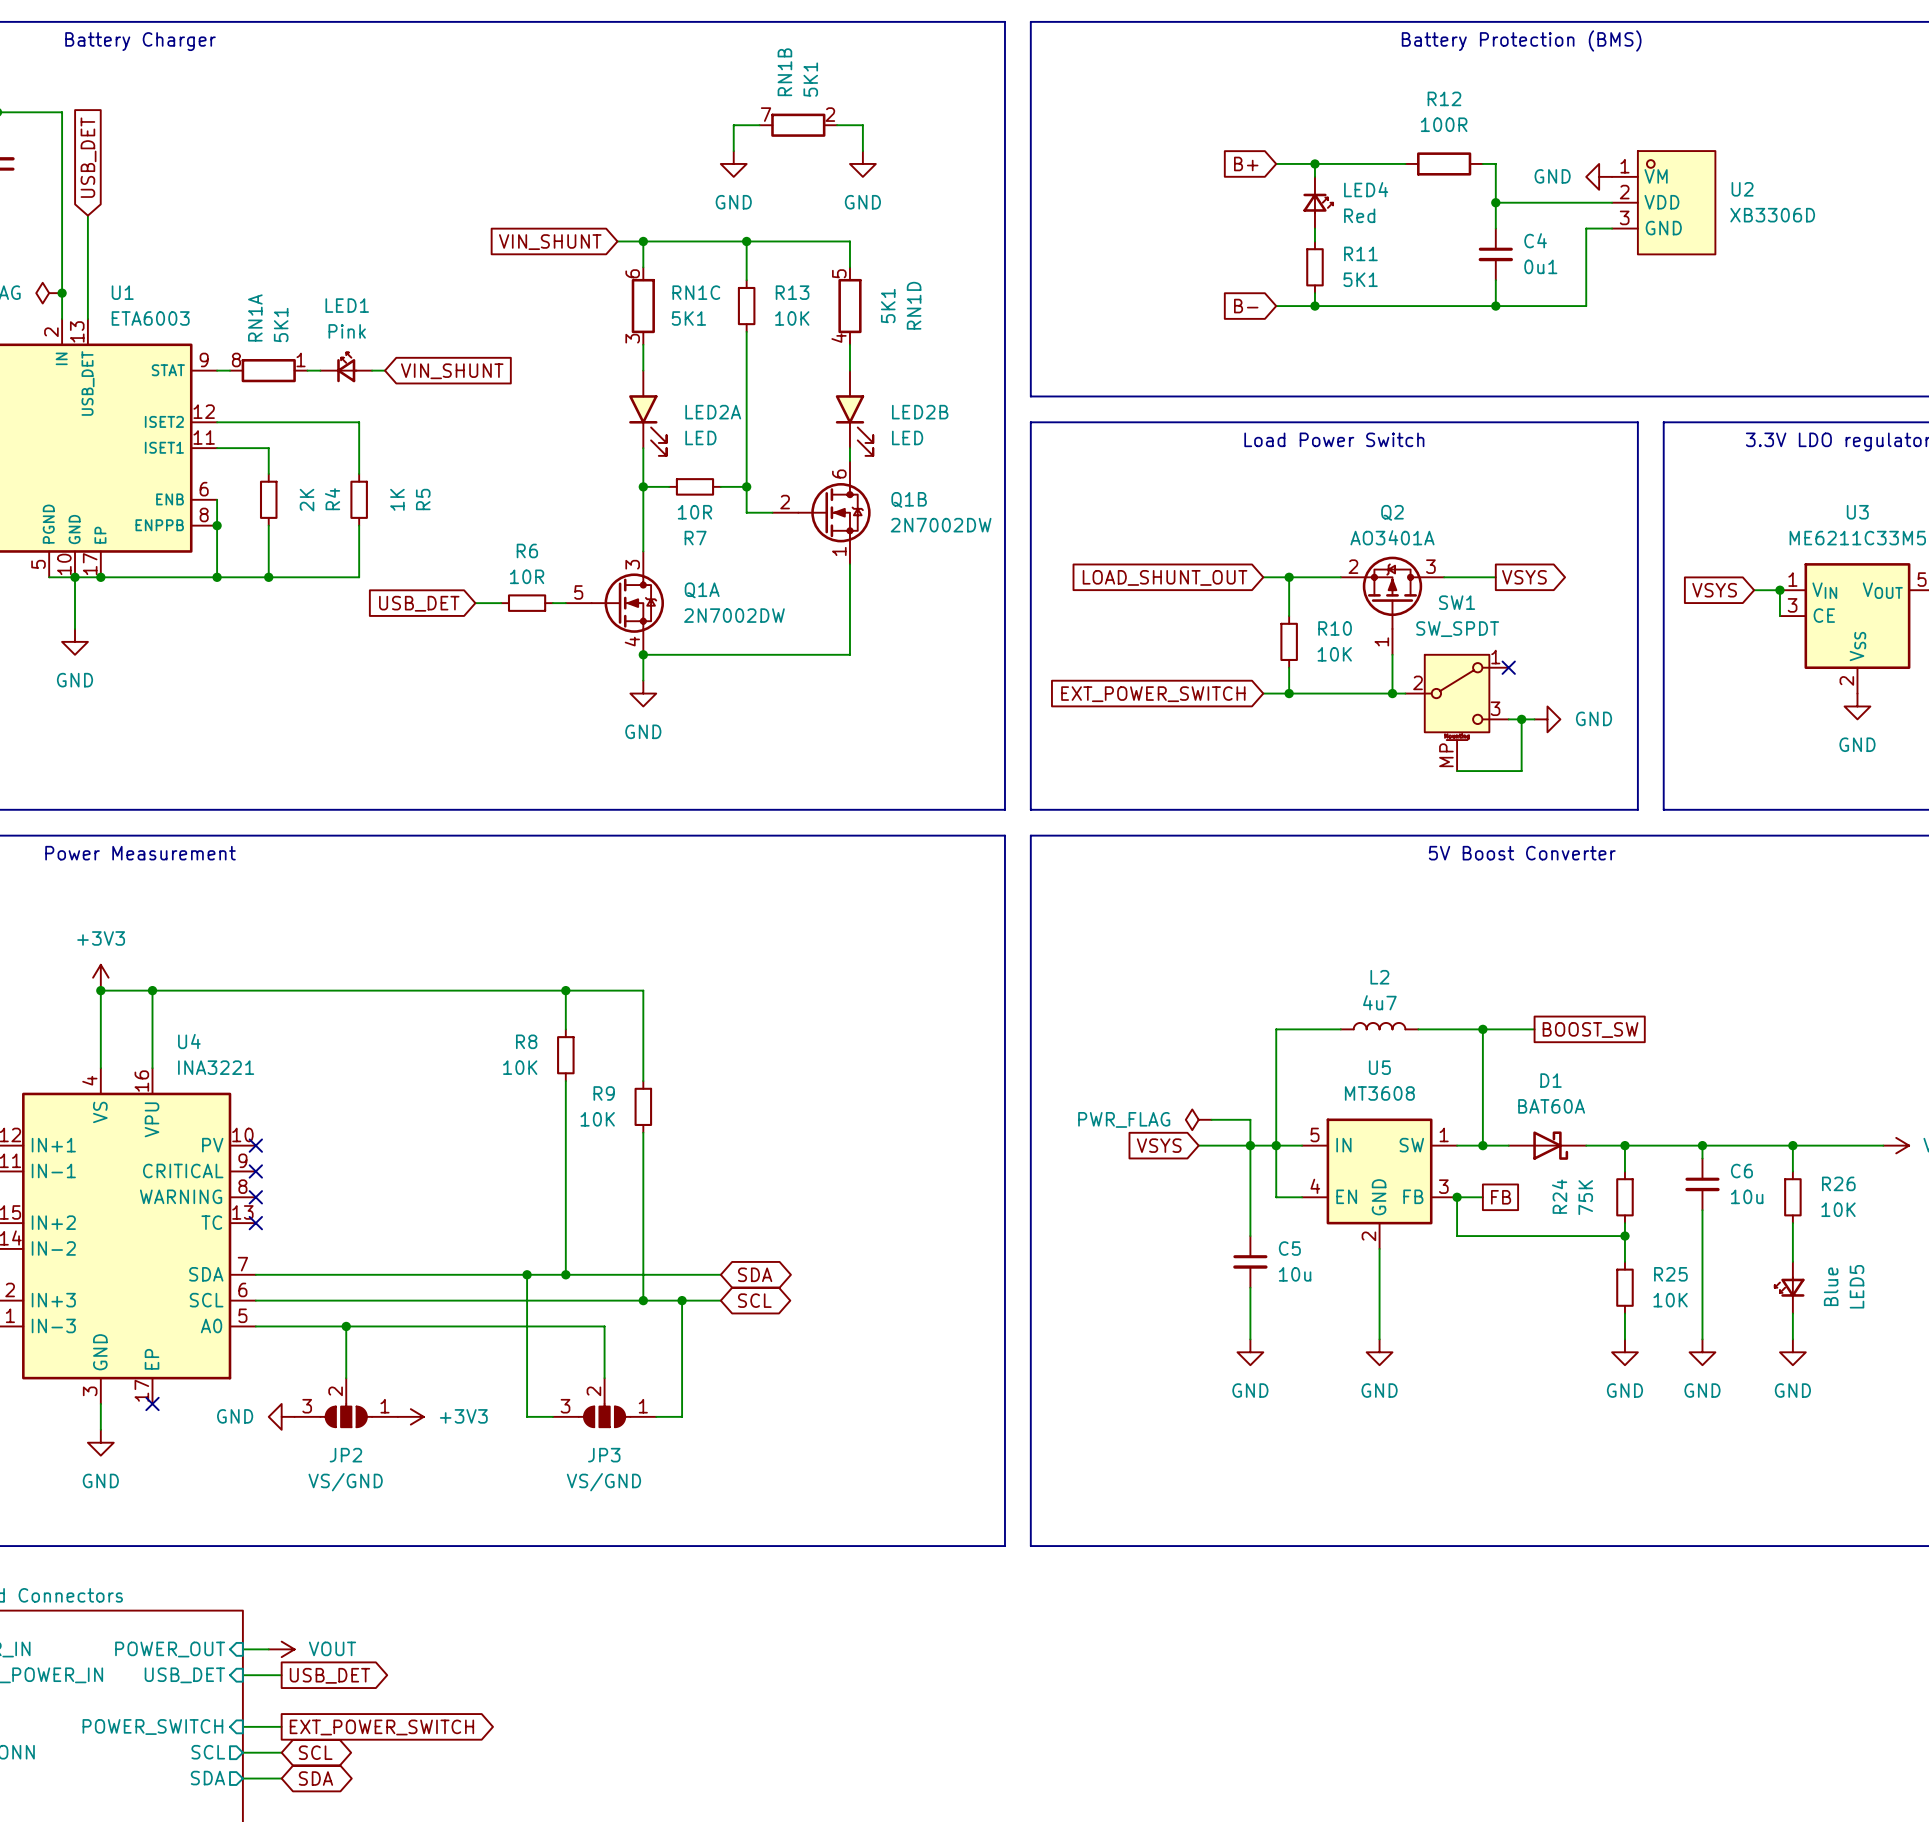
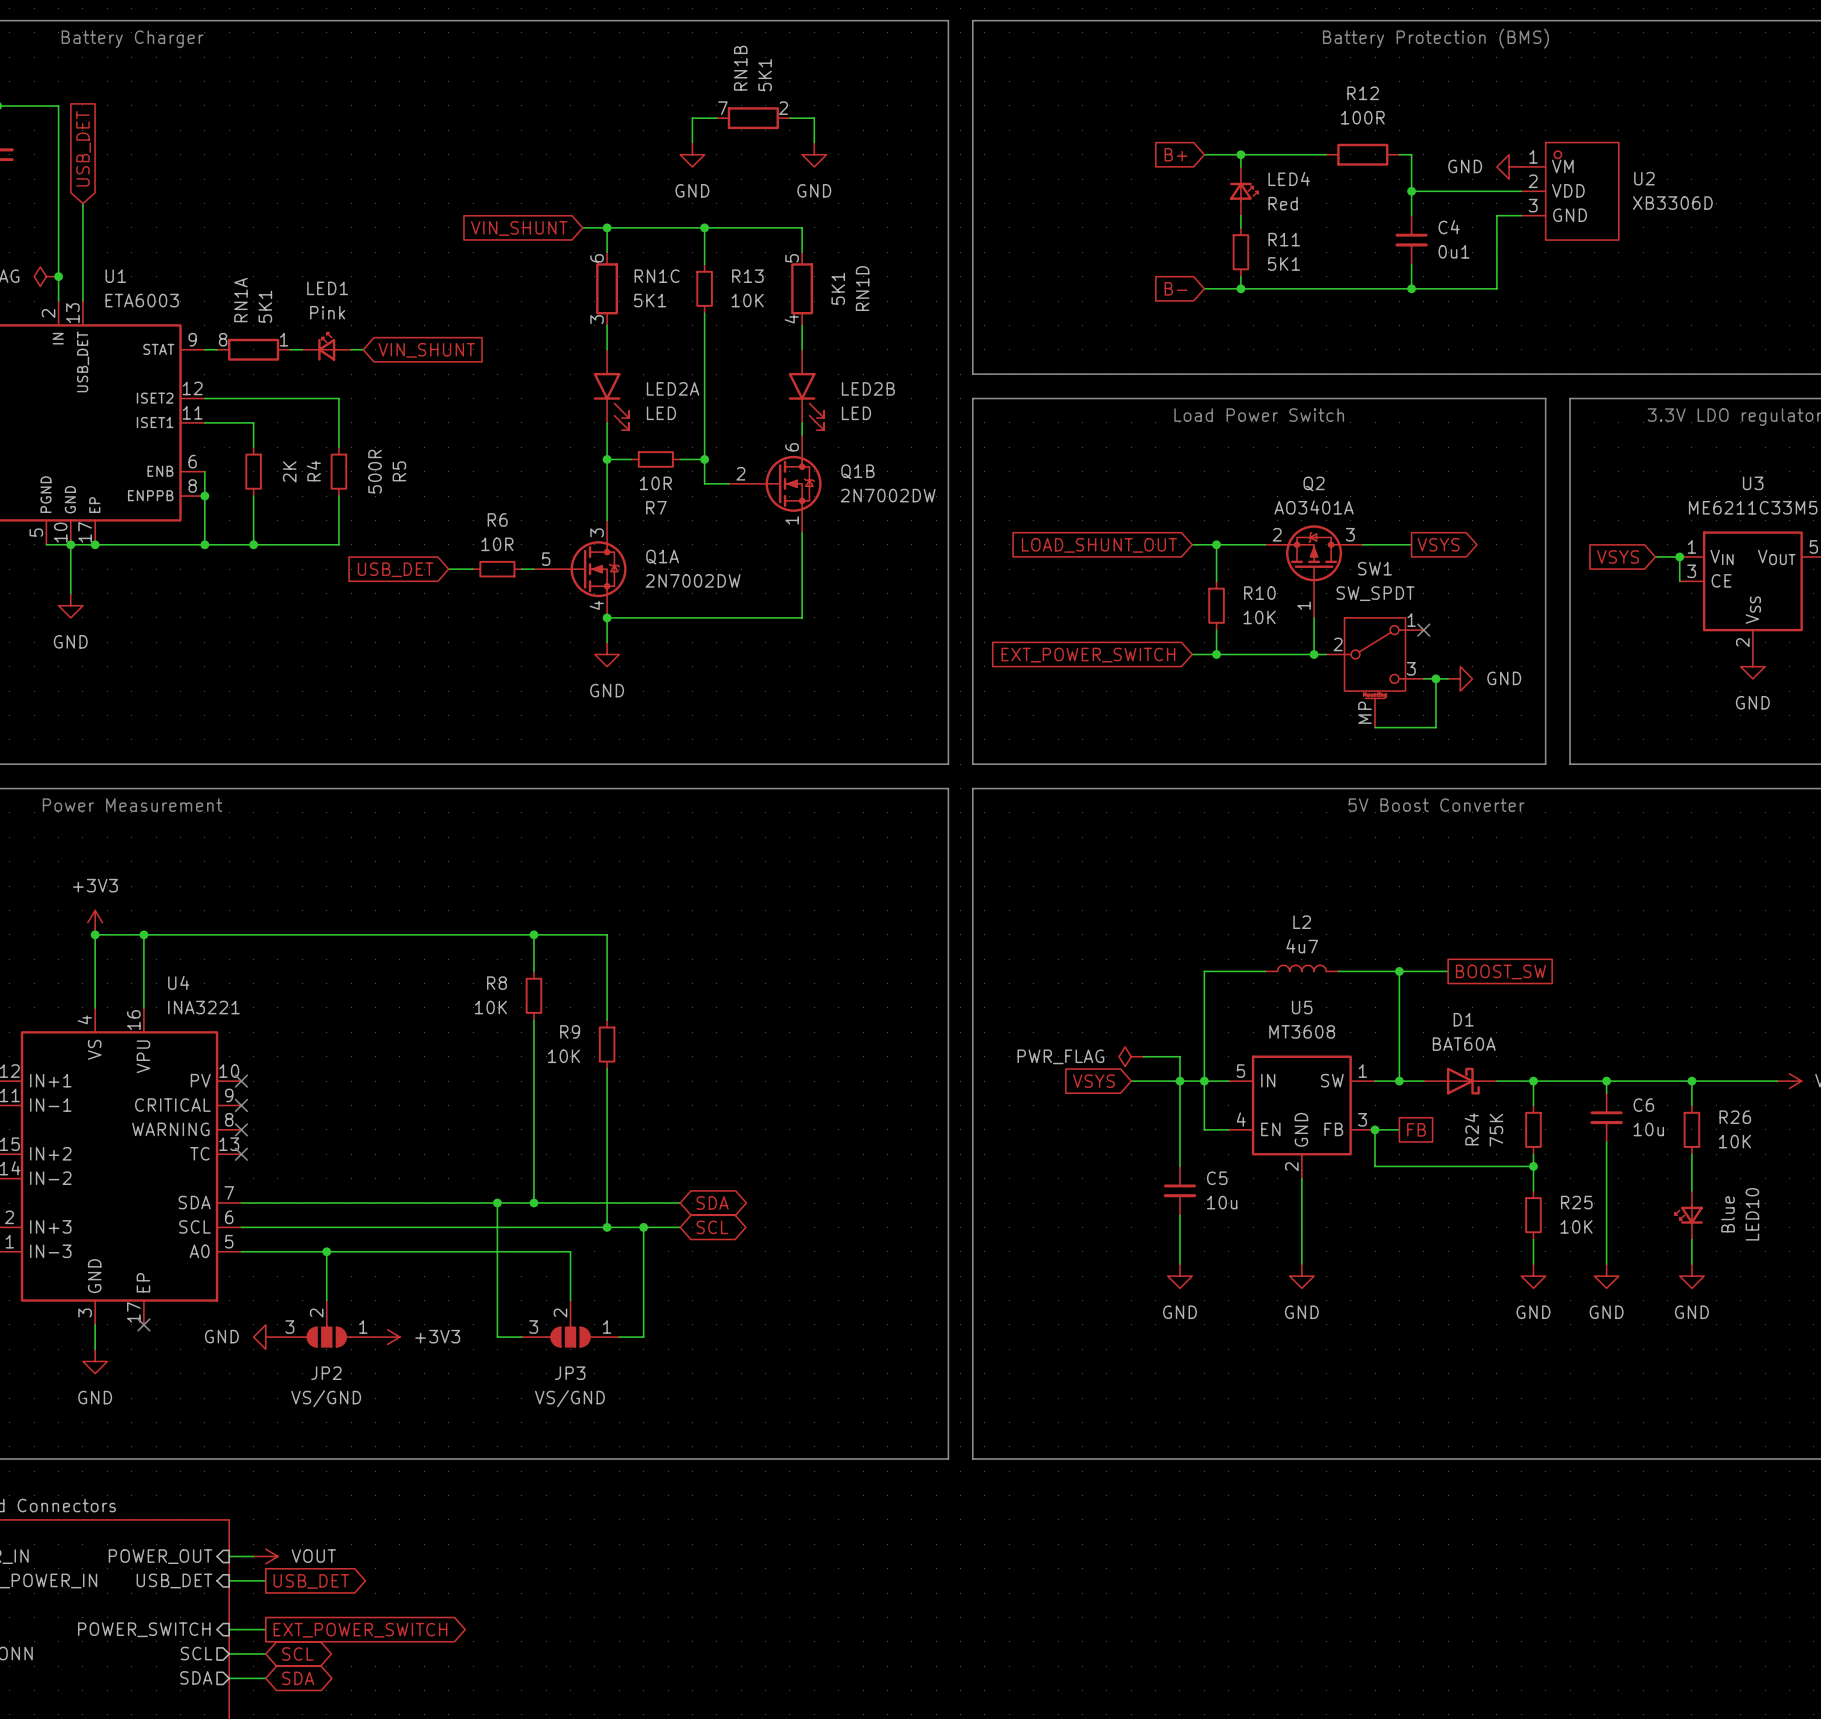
R5 value: 1K (397, 499) -> 500R (375, 471)
LED5 name: LED5 (1856, 1286) -> LED10 (1752, 1214)

